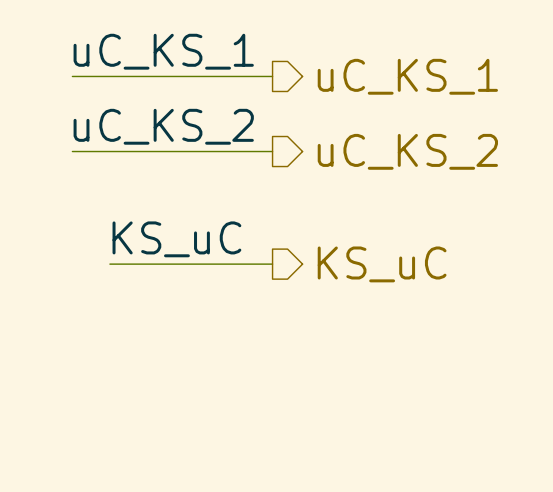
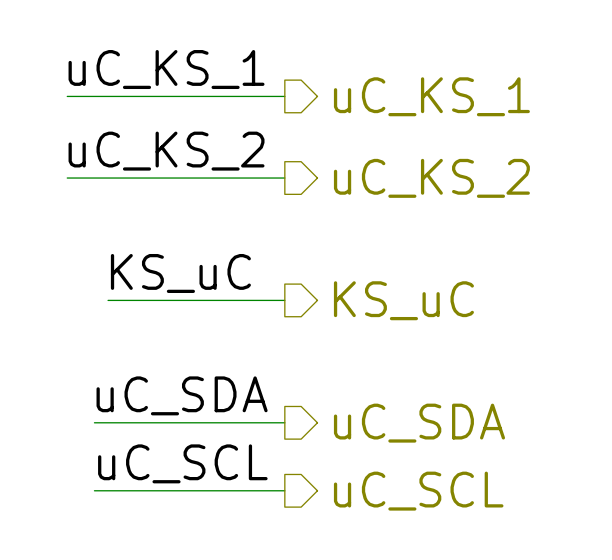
label: none -> uC_SDA (182, 395)
wire: none -> (94, 422) (284, 422)
hierarchical label: none -> uC_SDA (419, 423)
label: none -> uC_SCL (182, 463)
wire: none -> (94, 490) (284, 490)
hierarchical label: none -> uC_SCL (418, 491)

